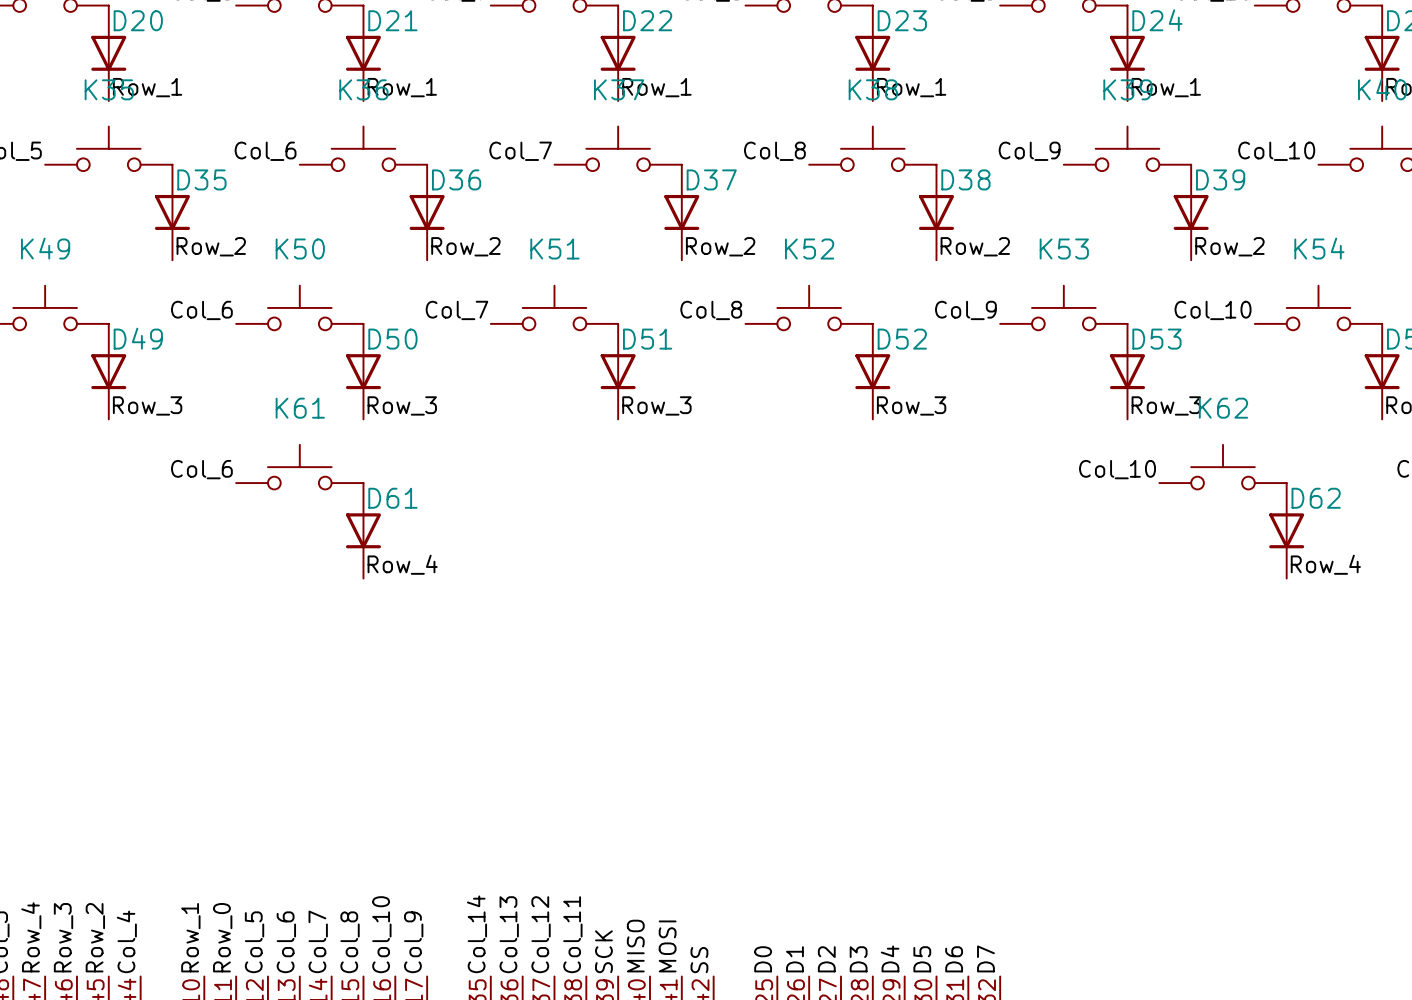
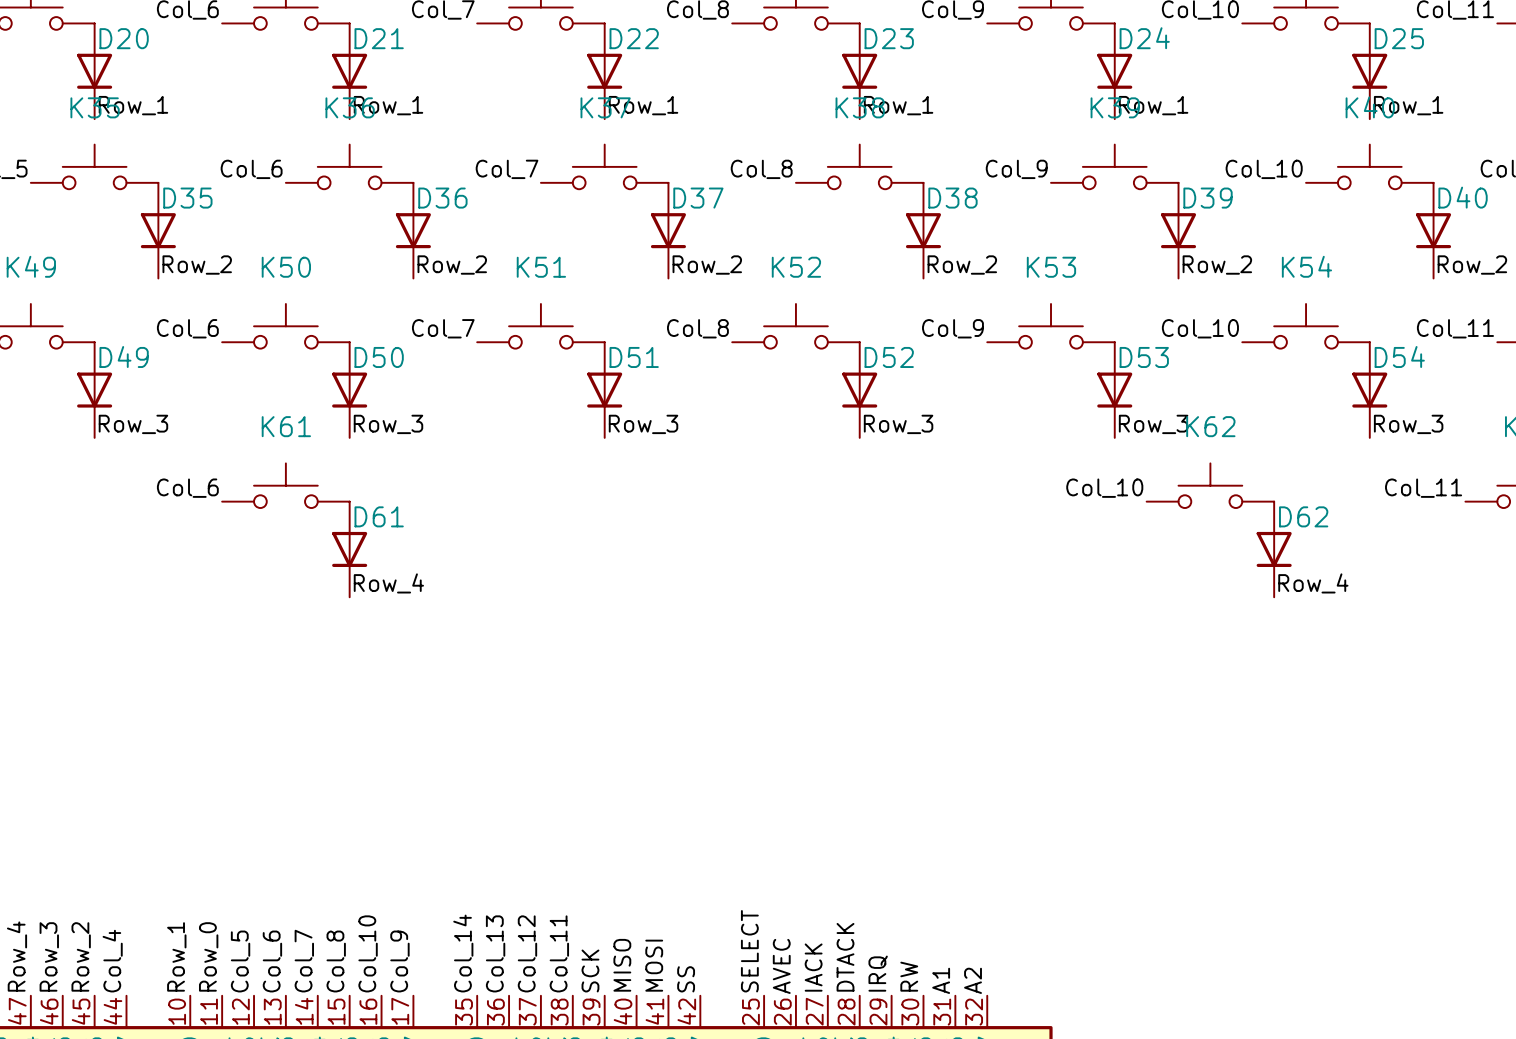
label: D4 (890, 958) -> IRQ (878, 973)
label: D7 (985, 958) -> A2 (973, 980)
label: D0 (763, 959) -> SELECT (749, 951)
label: D1 (794, 959) -> AVEC (781, 966)
label: D2 (826, 959) -> IACK (813, 967)
label: D3 (858, 959) -> DTACK (845, 957)
label: D5 (922, 959) -> RW (909, 976)
label: D6 (954, 959) -> A1 (941, 980)

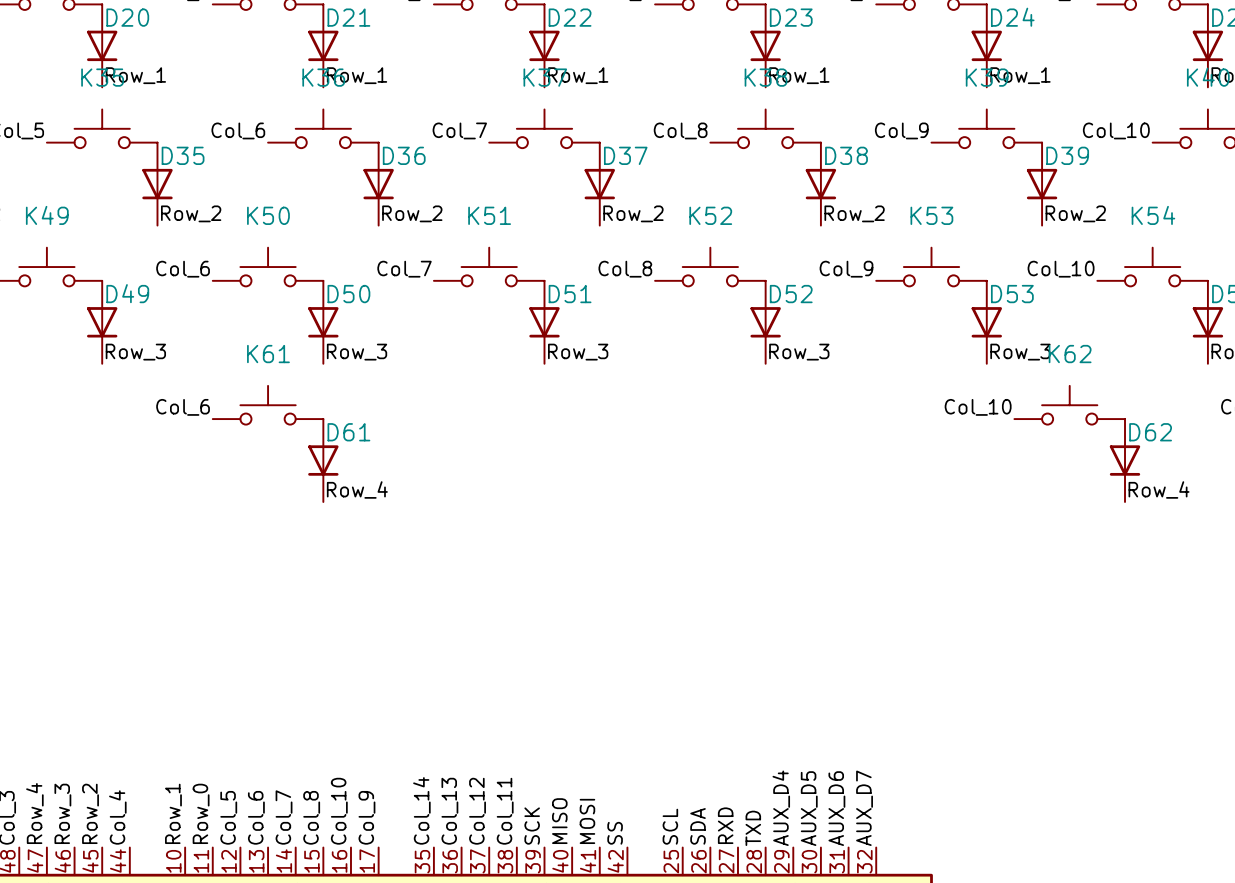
label: SELECT (749, 951) -> SCL (670, 826)
label: DTACK (845, 957) -> TXD (753, 828)
label: AVEC (781, 966) -> SDA (698, 826)
label: IACK (813, 967) -> RXD (725, 825)
label: IRQ (878, 973) -> AUX_D4 (781, 808)
label: RW (909, 976) -> AUX_D5 (809, 808)
label: A1 (941, 980) -> AUX_D6 (836, 808)
label: A2 (973, 980) -> AUX_D7 (864, 808)

